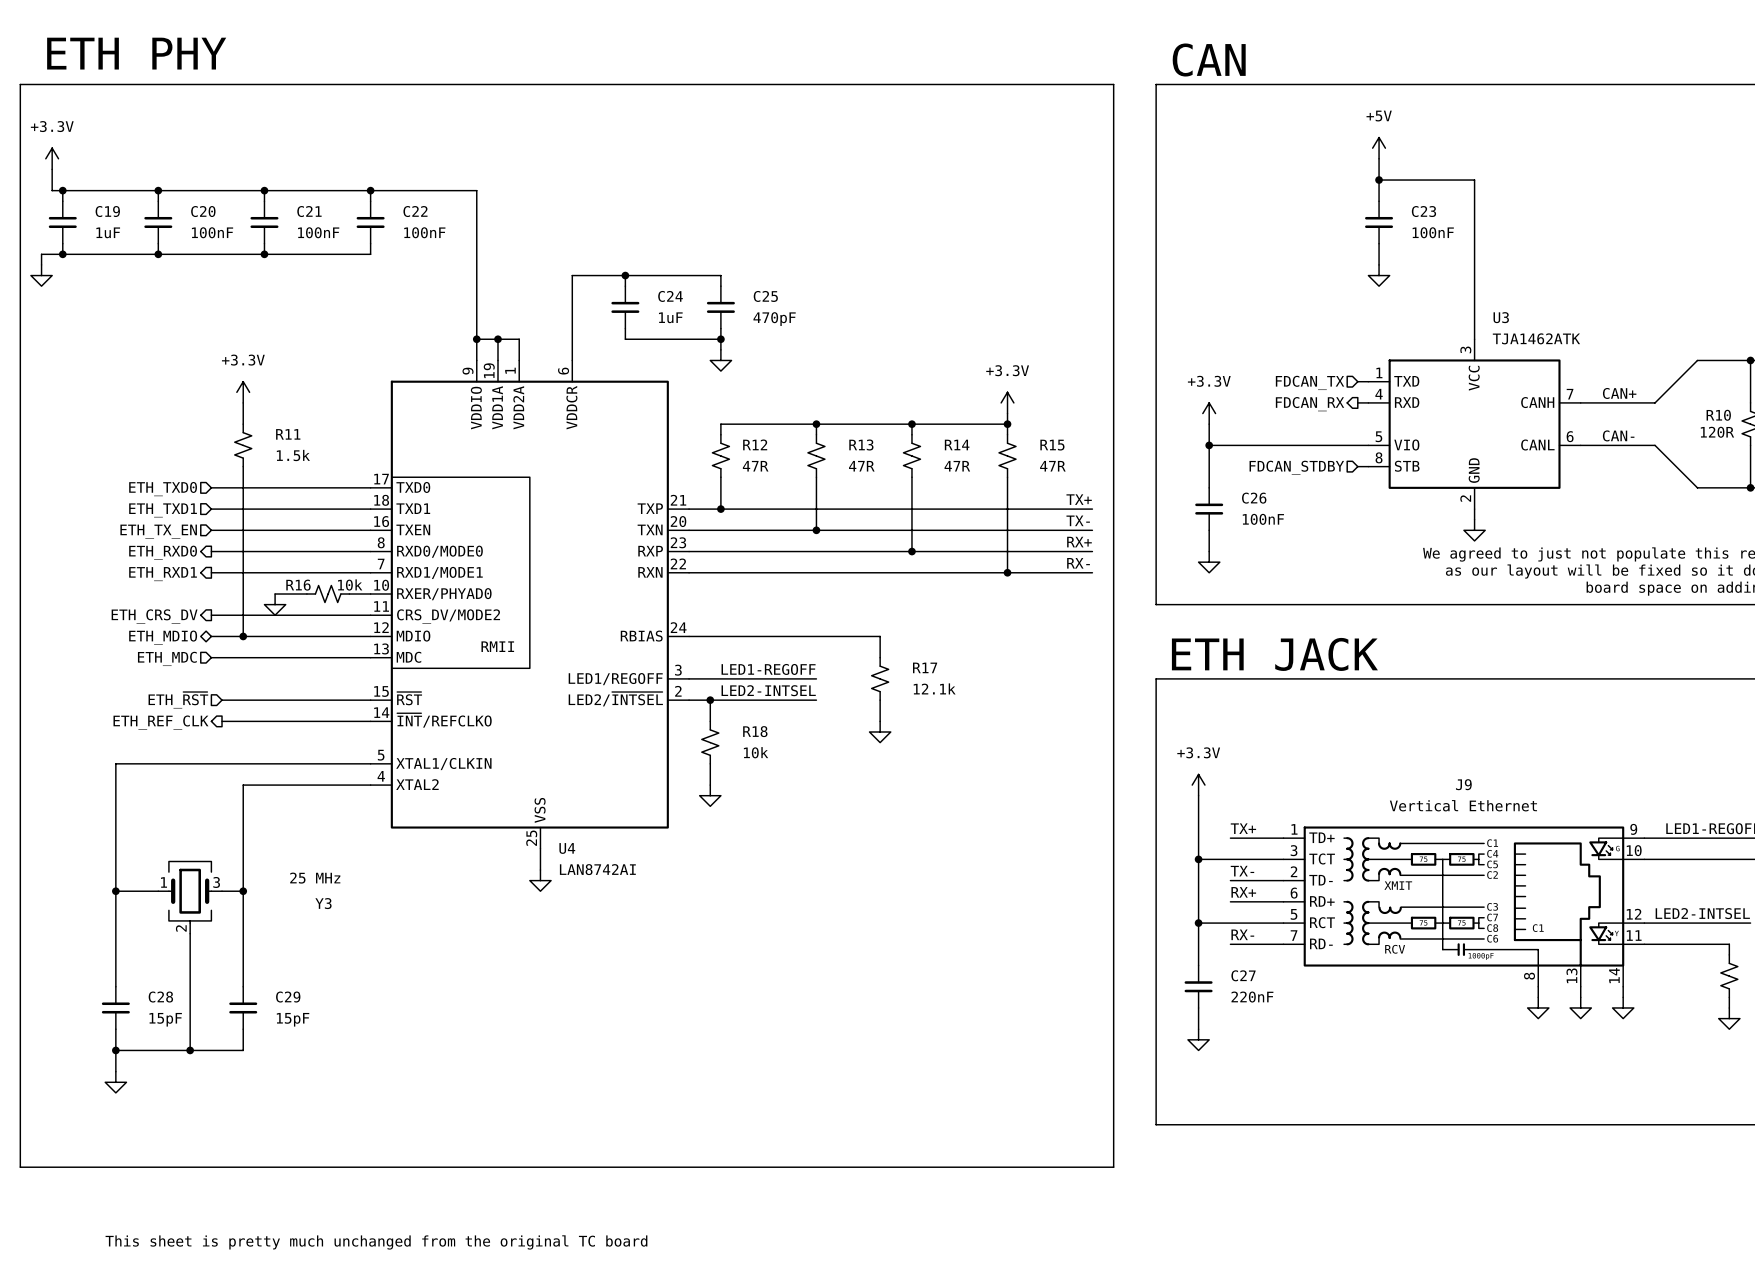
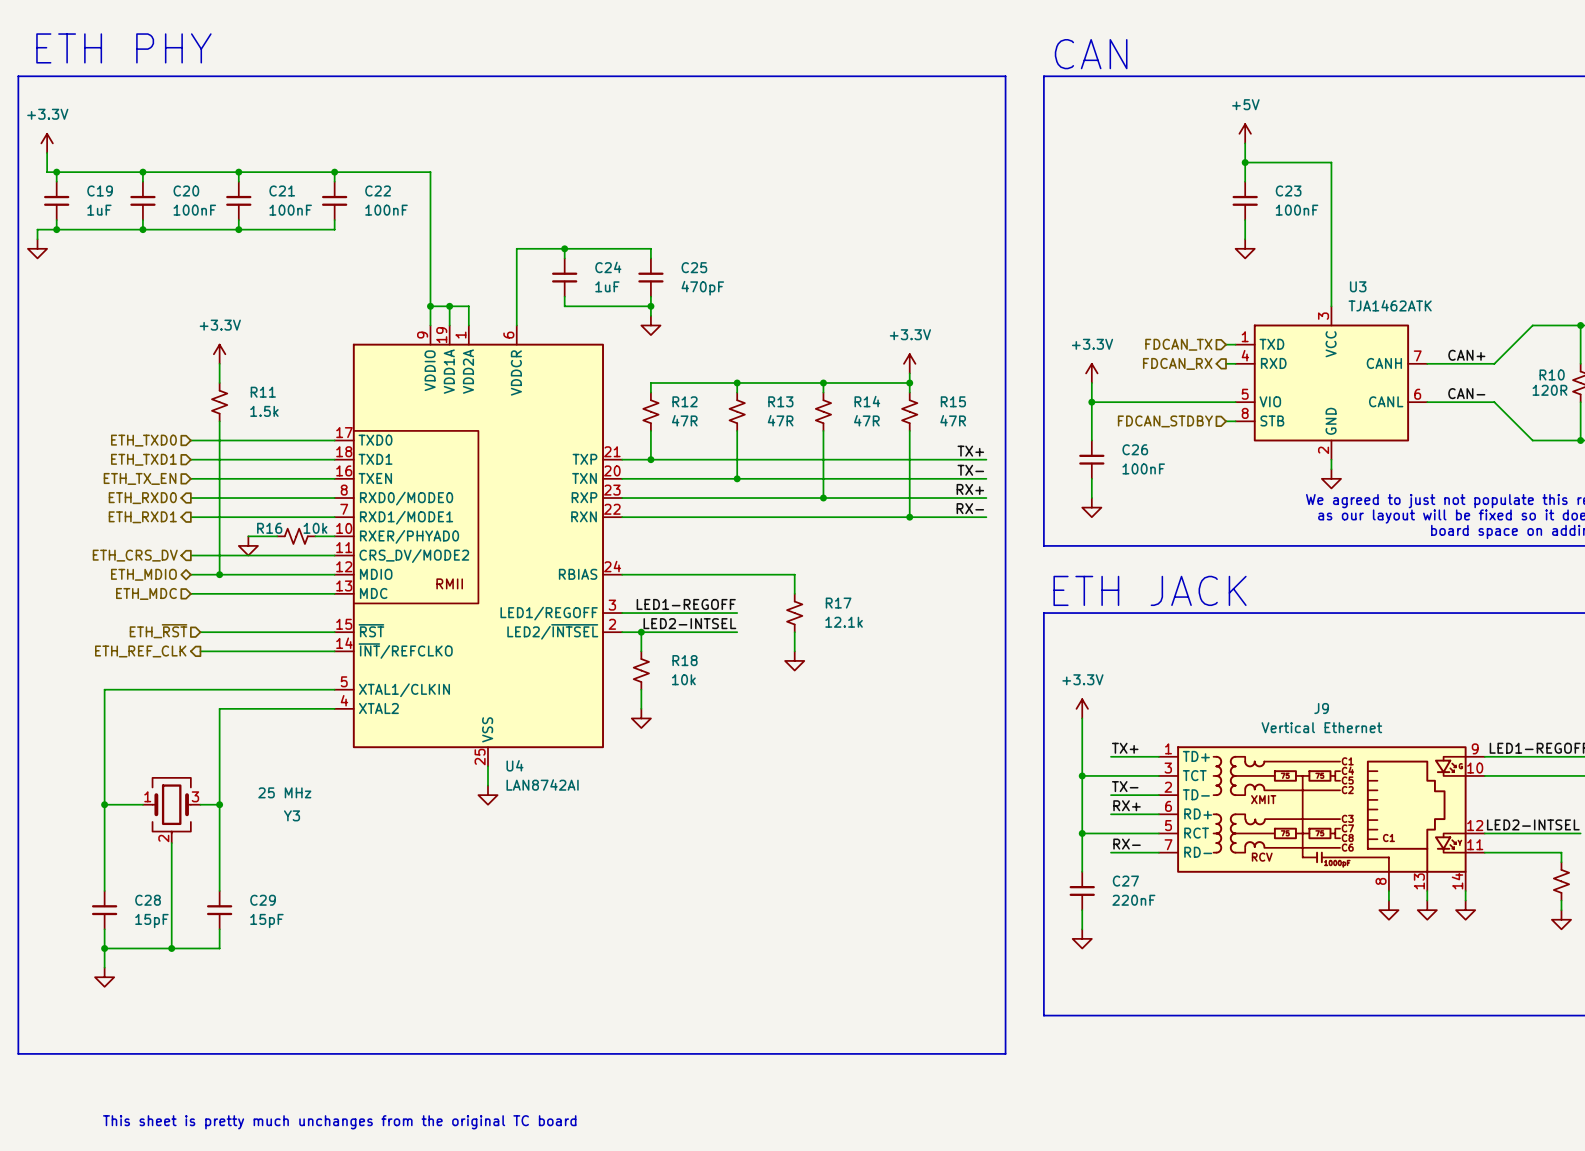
text: This sheet is pretty much unchanged from the original TC board (376, 1242) -> This sheet is pretty much unchanges from the original TC board (339, 1122)

